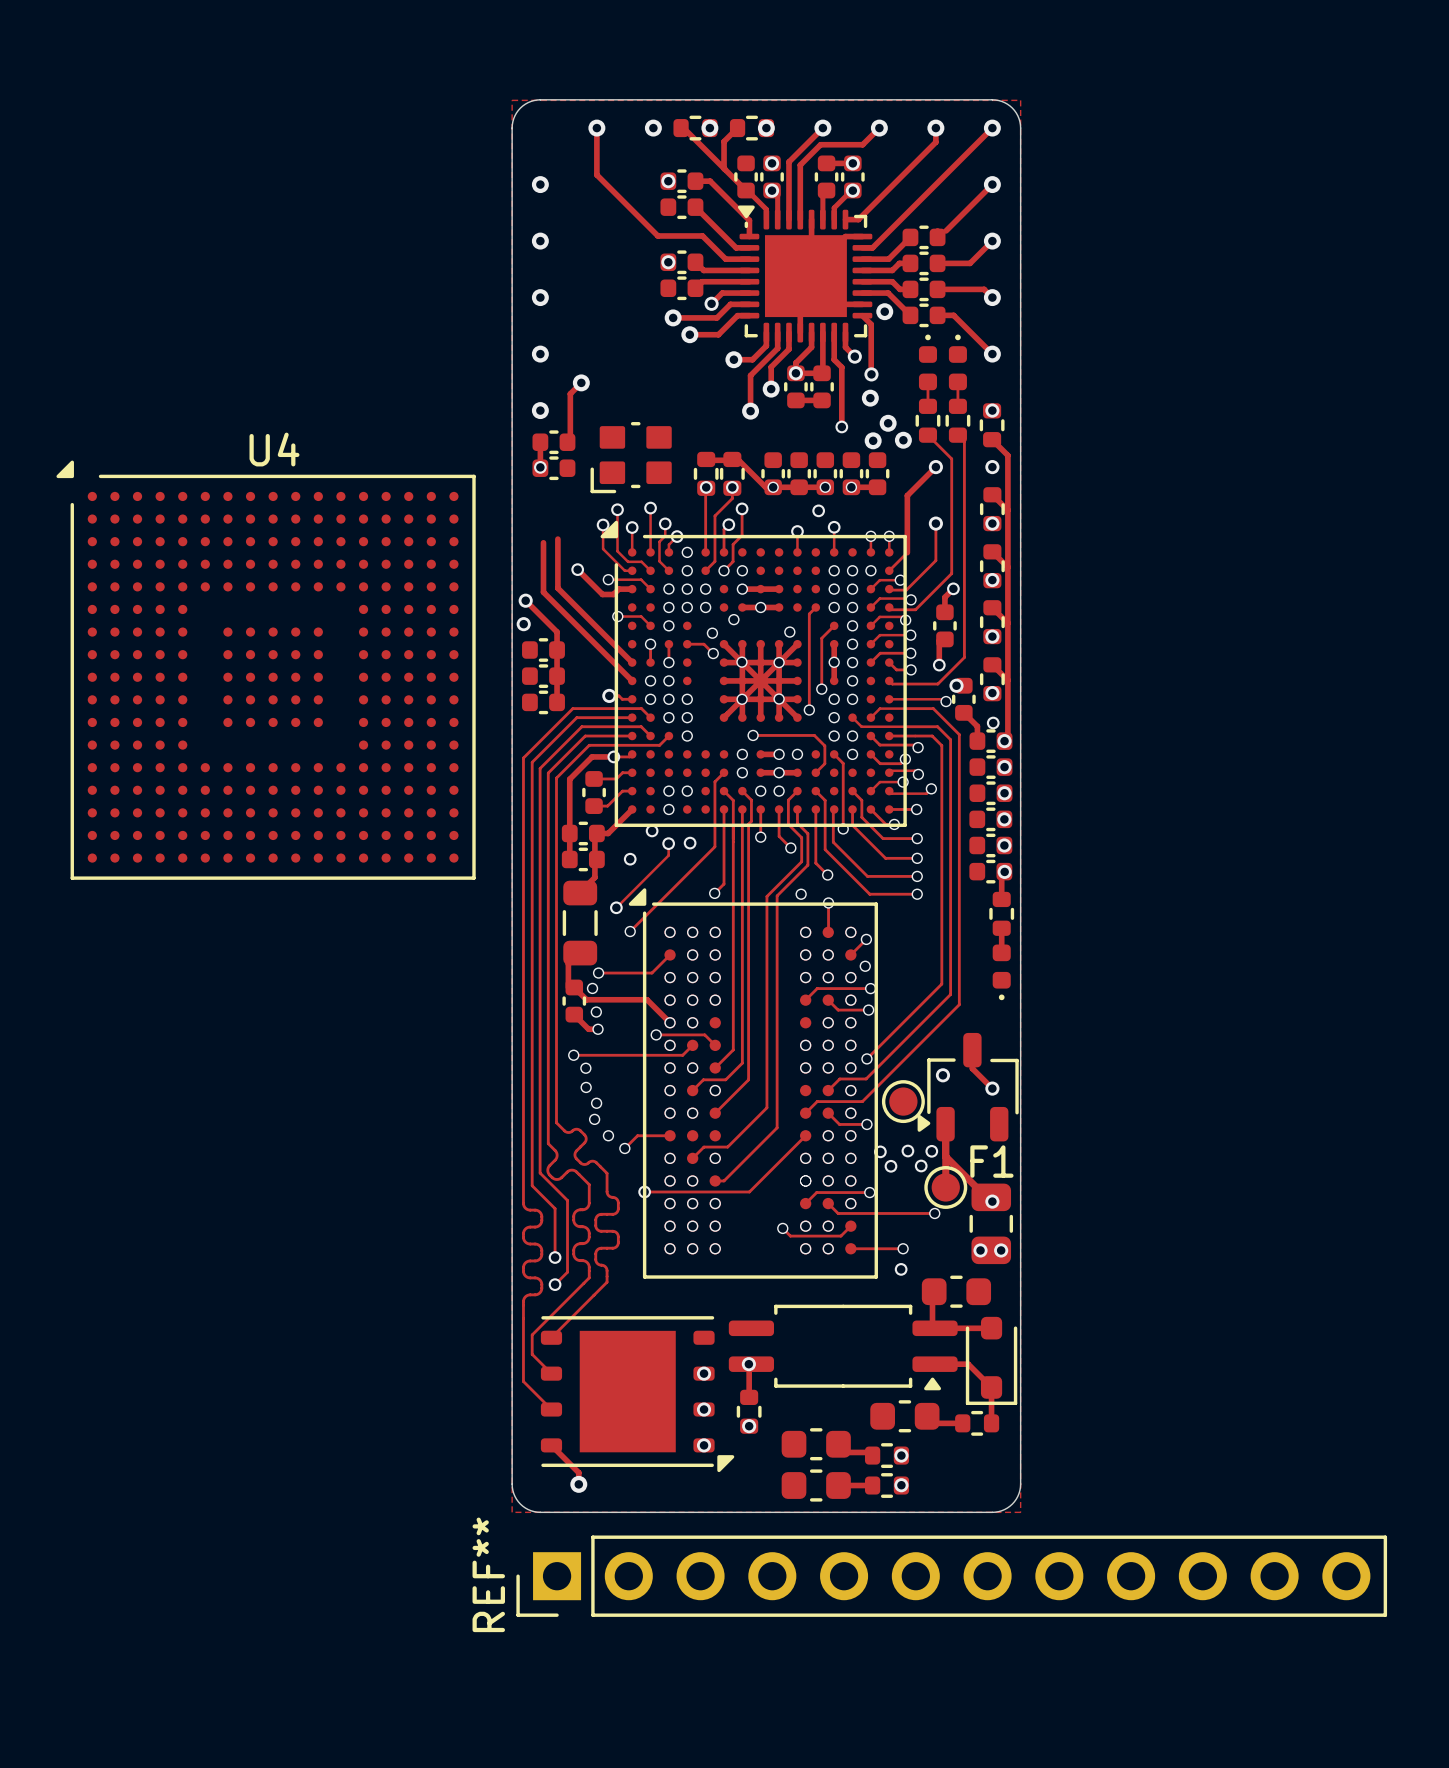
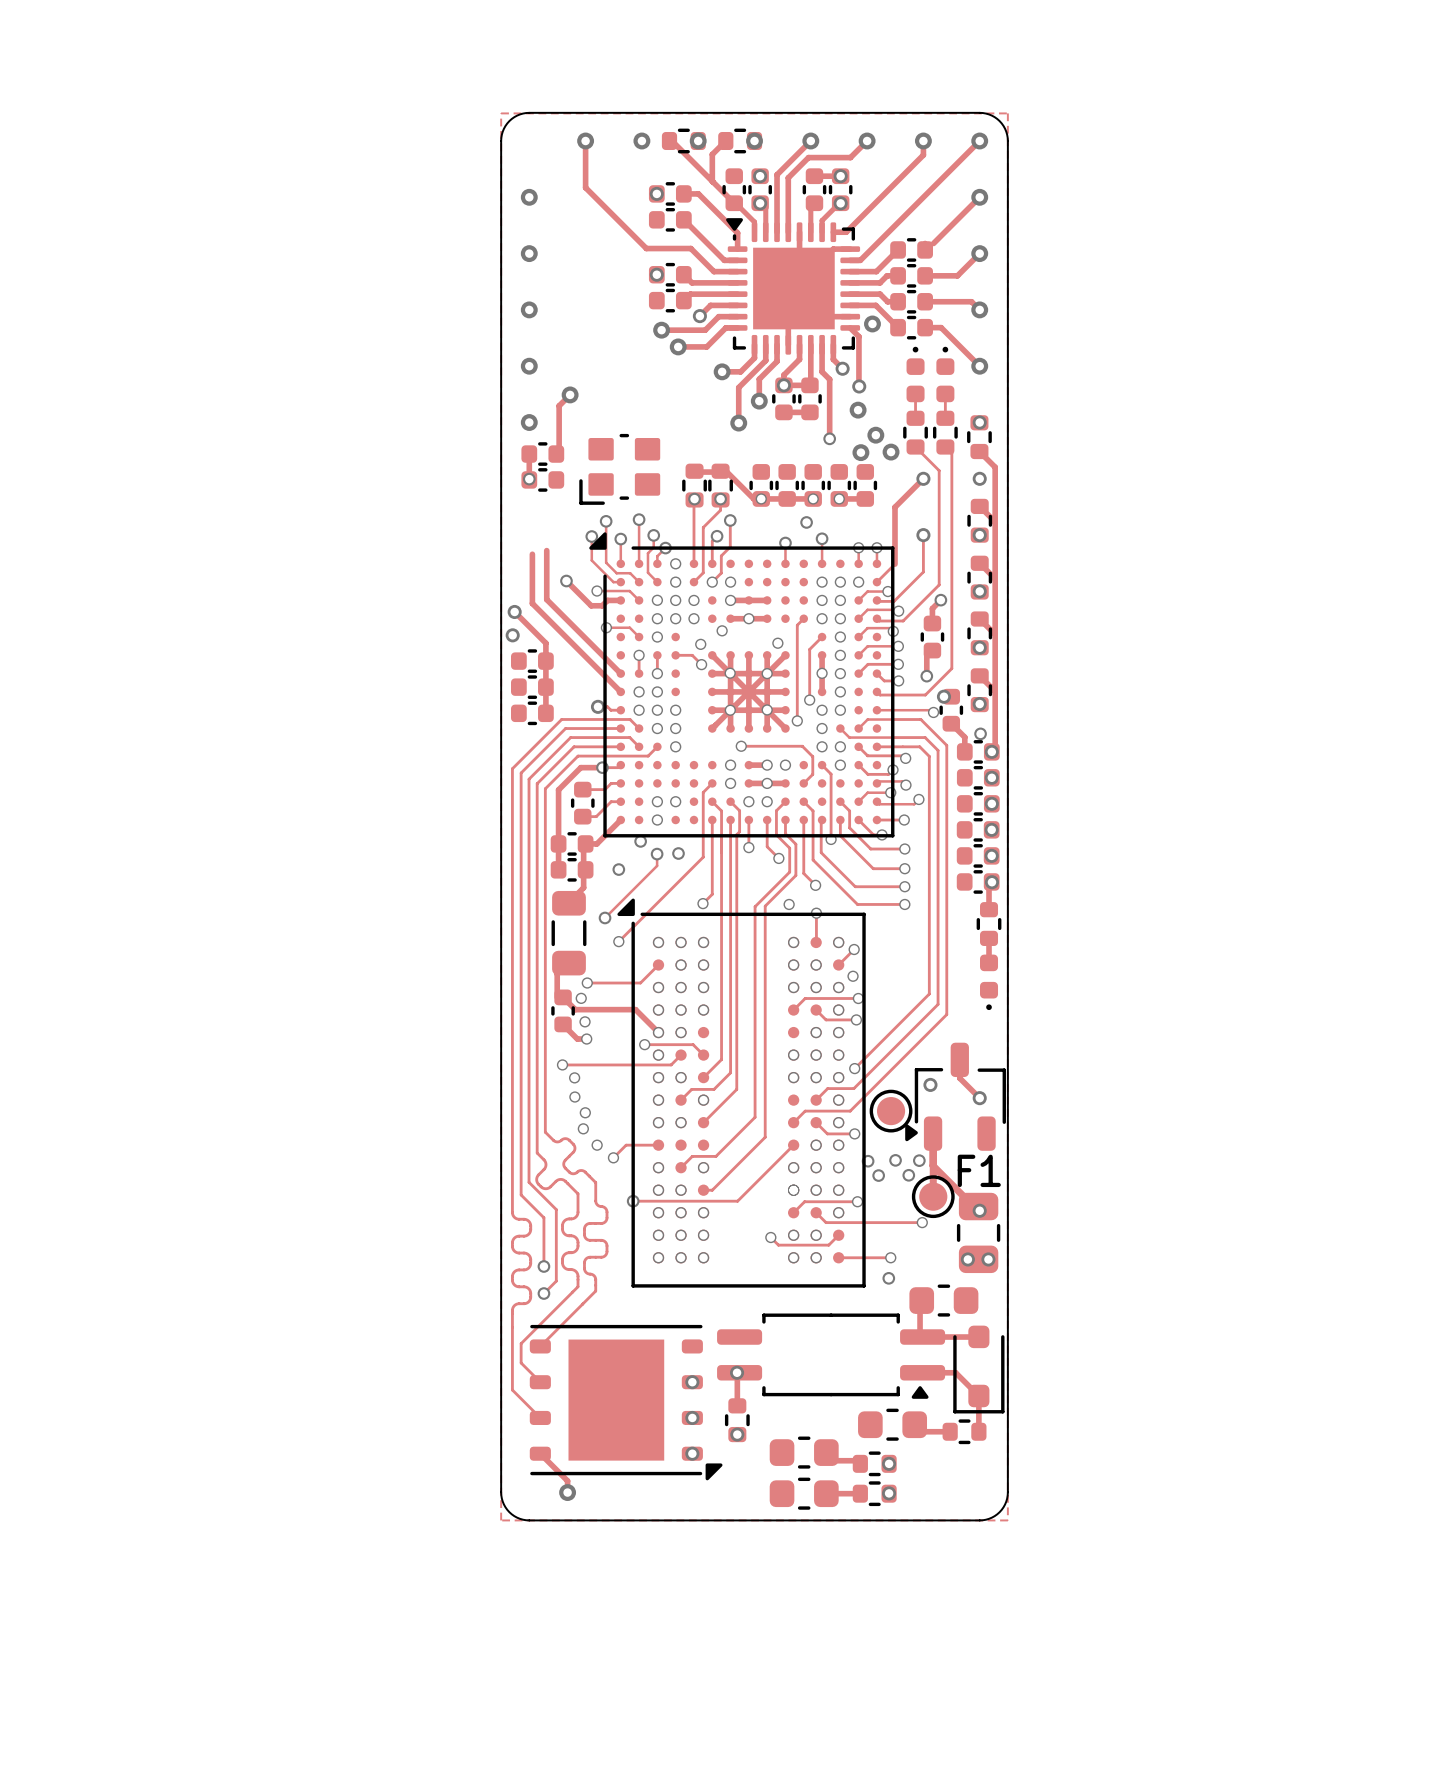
U4: (266, 670) -> none
REF**: (951, 1576) -> none

